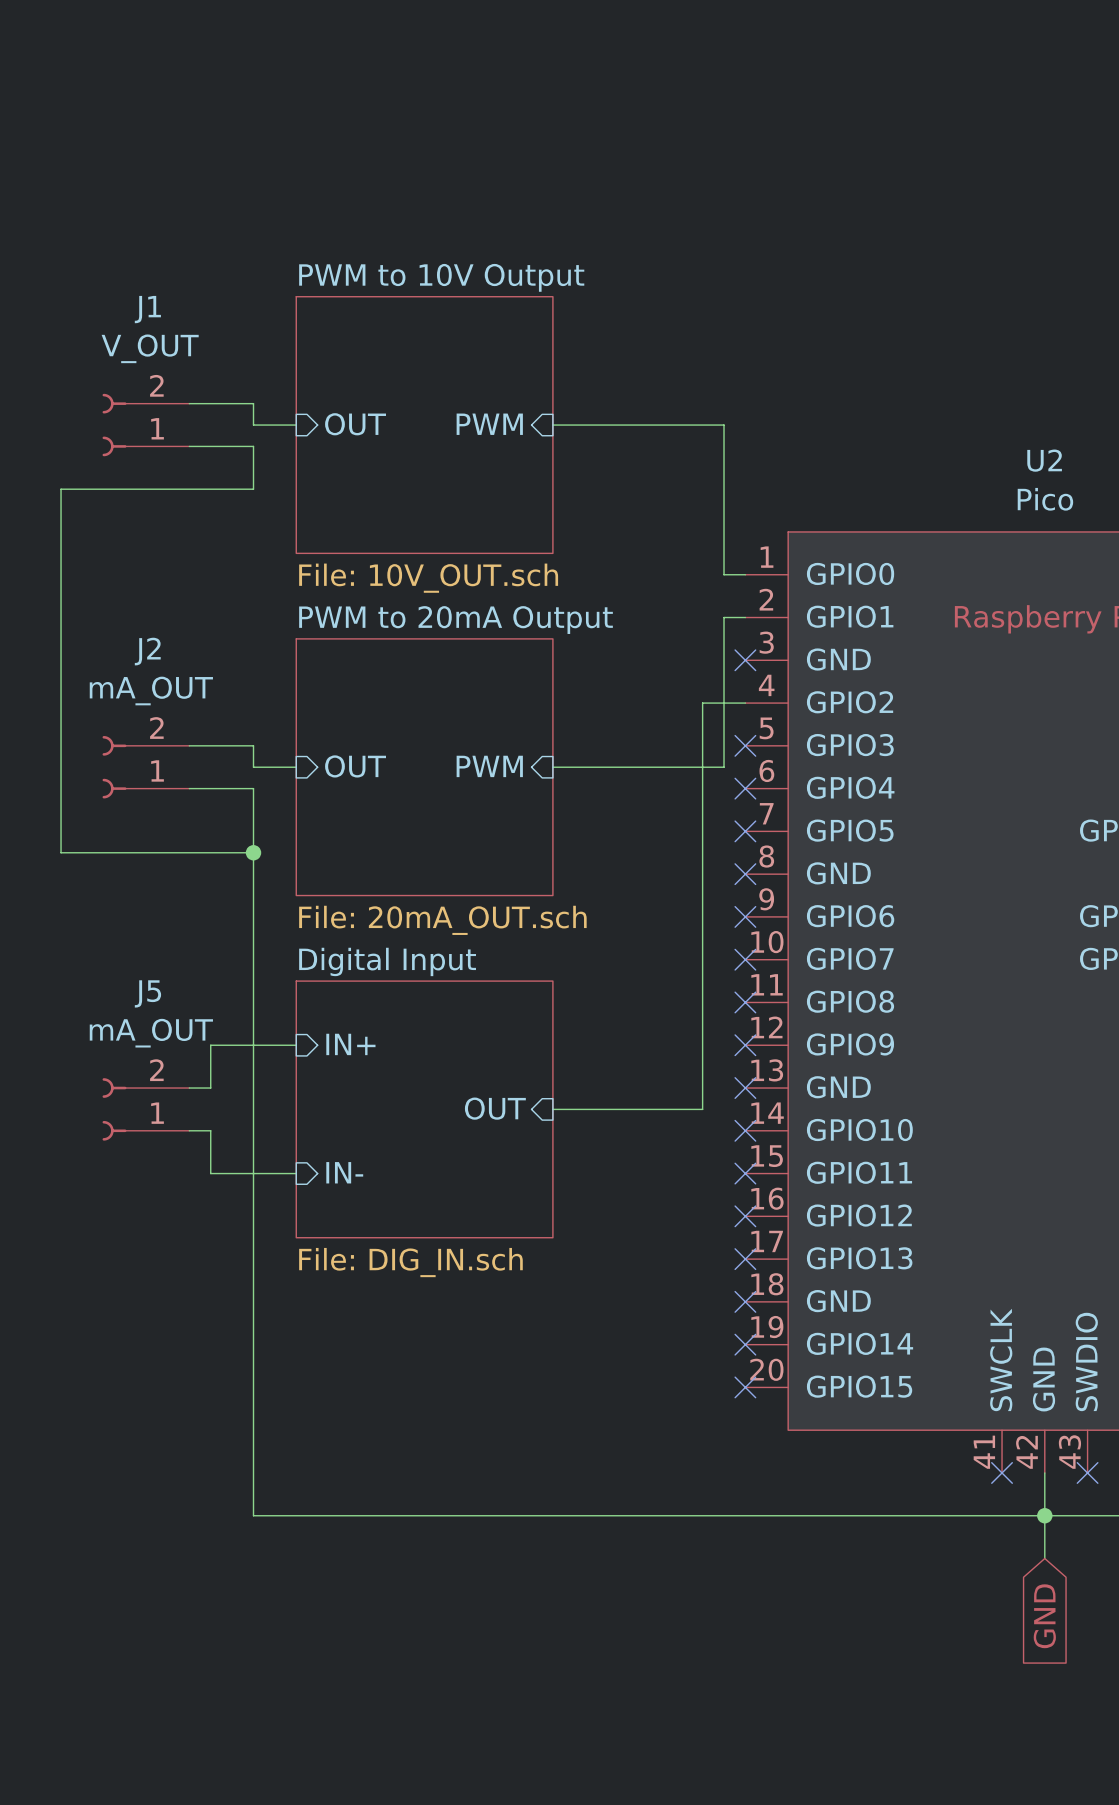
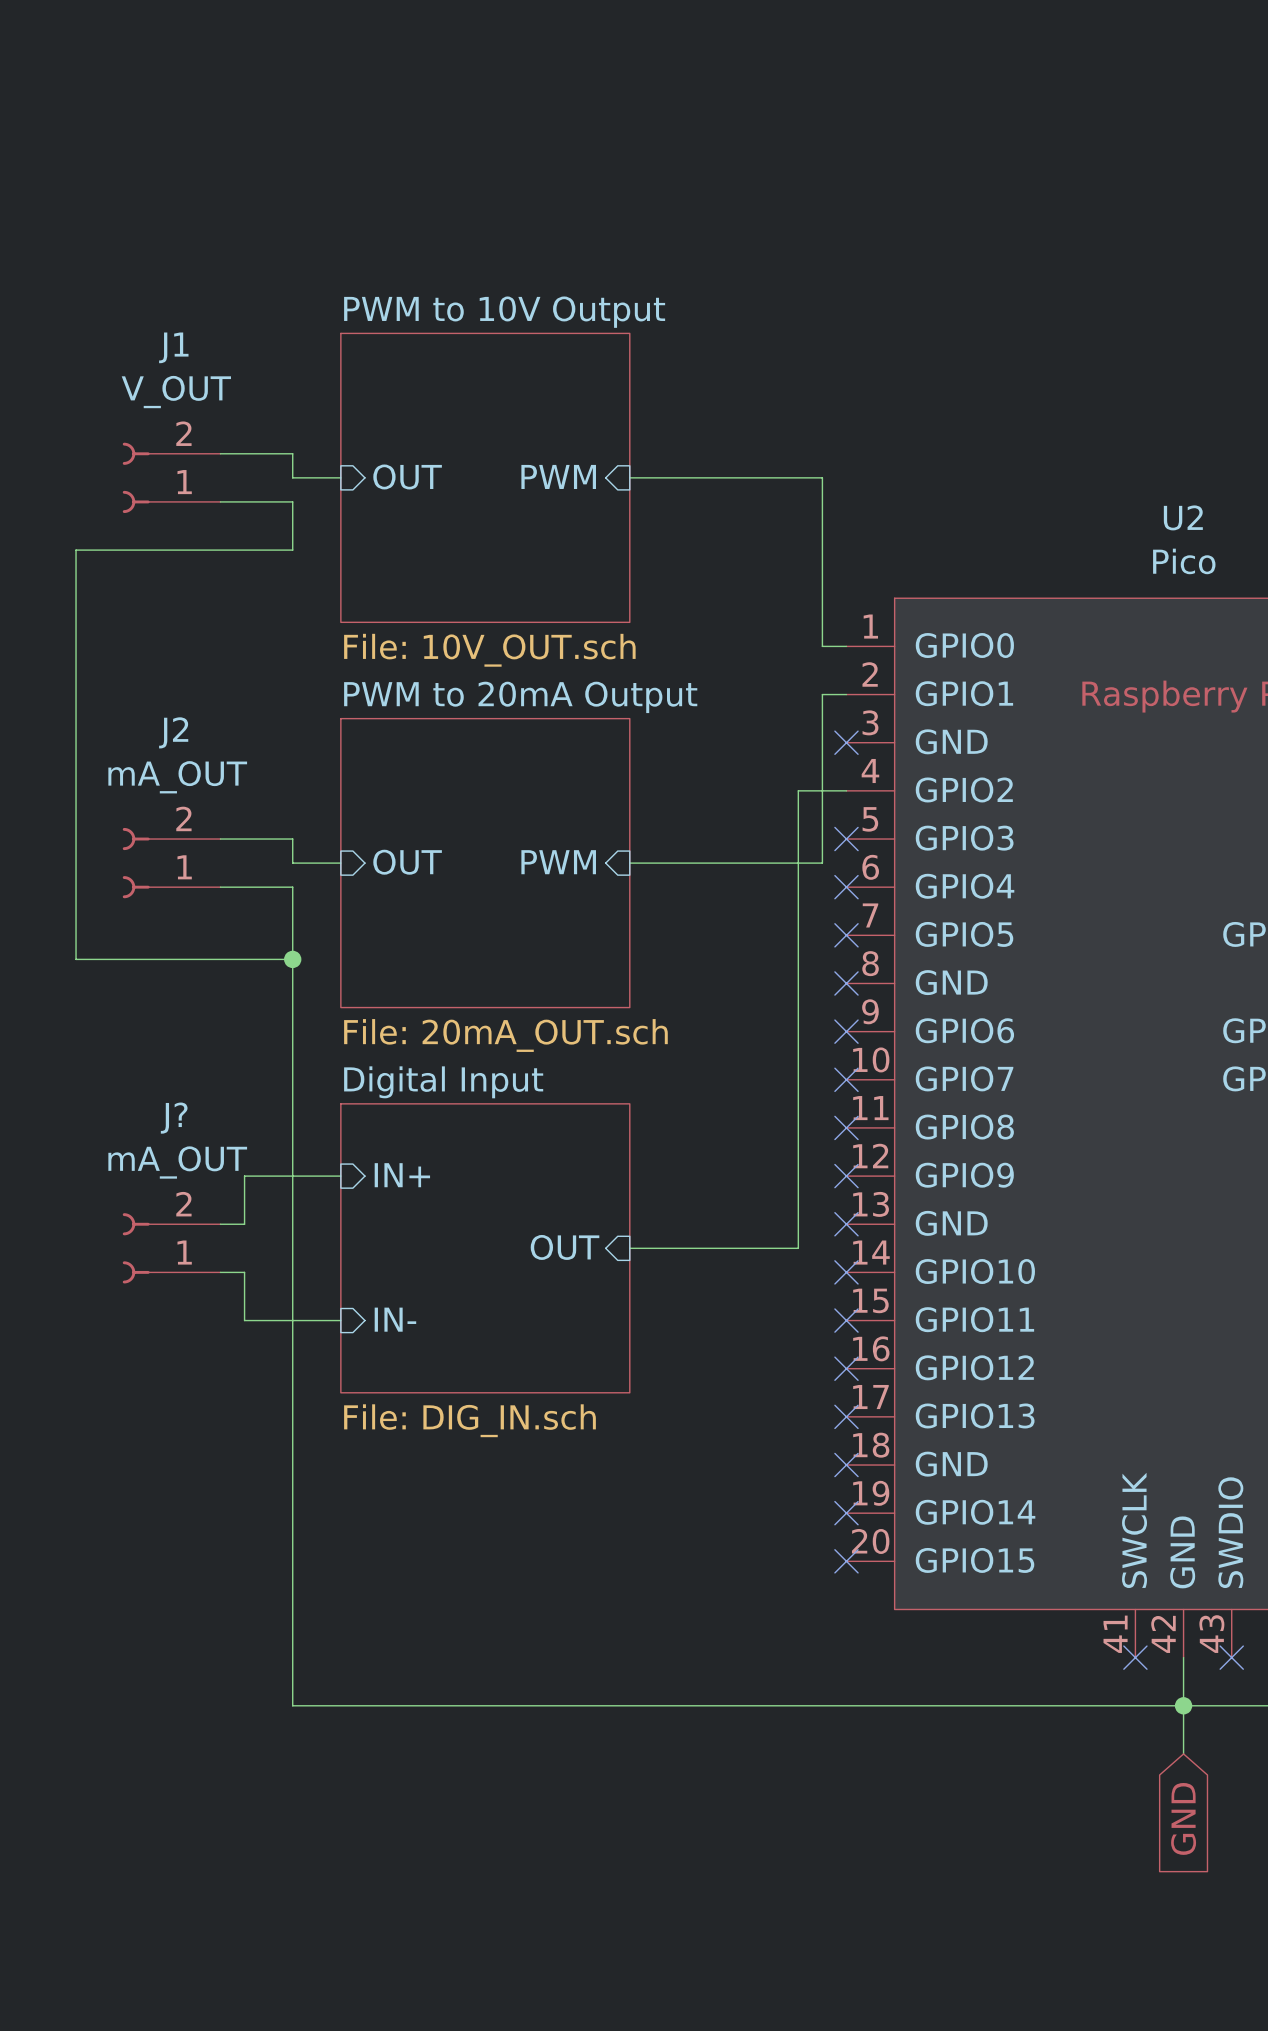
J5 name: J5 (147, 993) -> J? (174, 1118)

